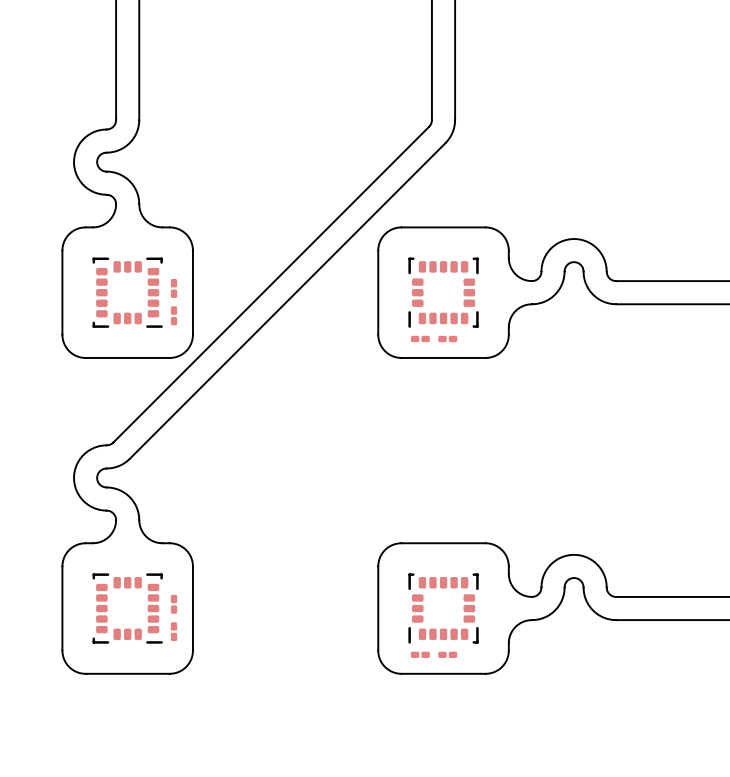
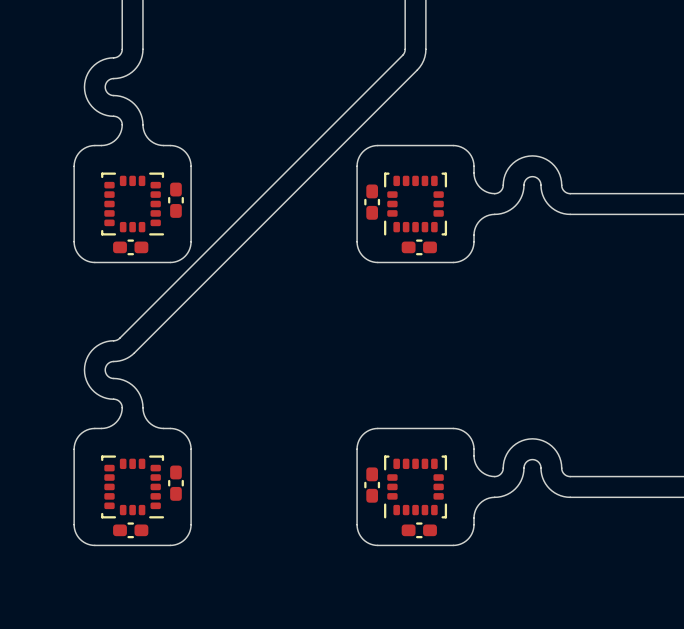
part footprint: [170, 279, 178, 298] -> [168, 182, 184, 218]
part: none -> (372, 202)
part: (174, 315) -> none
part footprint: [438, 335, 458, 343] -> [401, 239, 437, 256]
part: (420, 339) -> none
part: none -> (130, 247)
part footprint: [170, 594, 178, 614] -> [168, 465, 184, 501]
part: none -> (372, 485)
part: (174, 631) -> none
part footprint: [438, 651, 458, 659] -> [401, 522, 437, 539]
part: (420, 654) -> none
part: none -> (130, 530)

